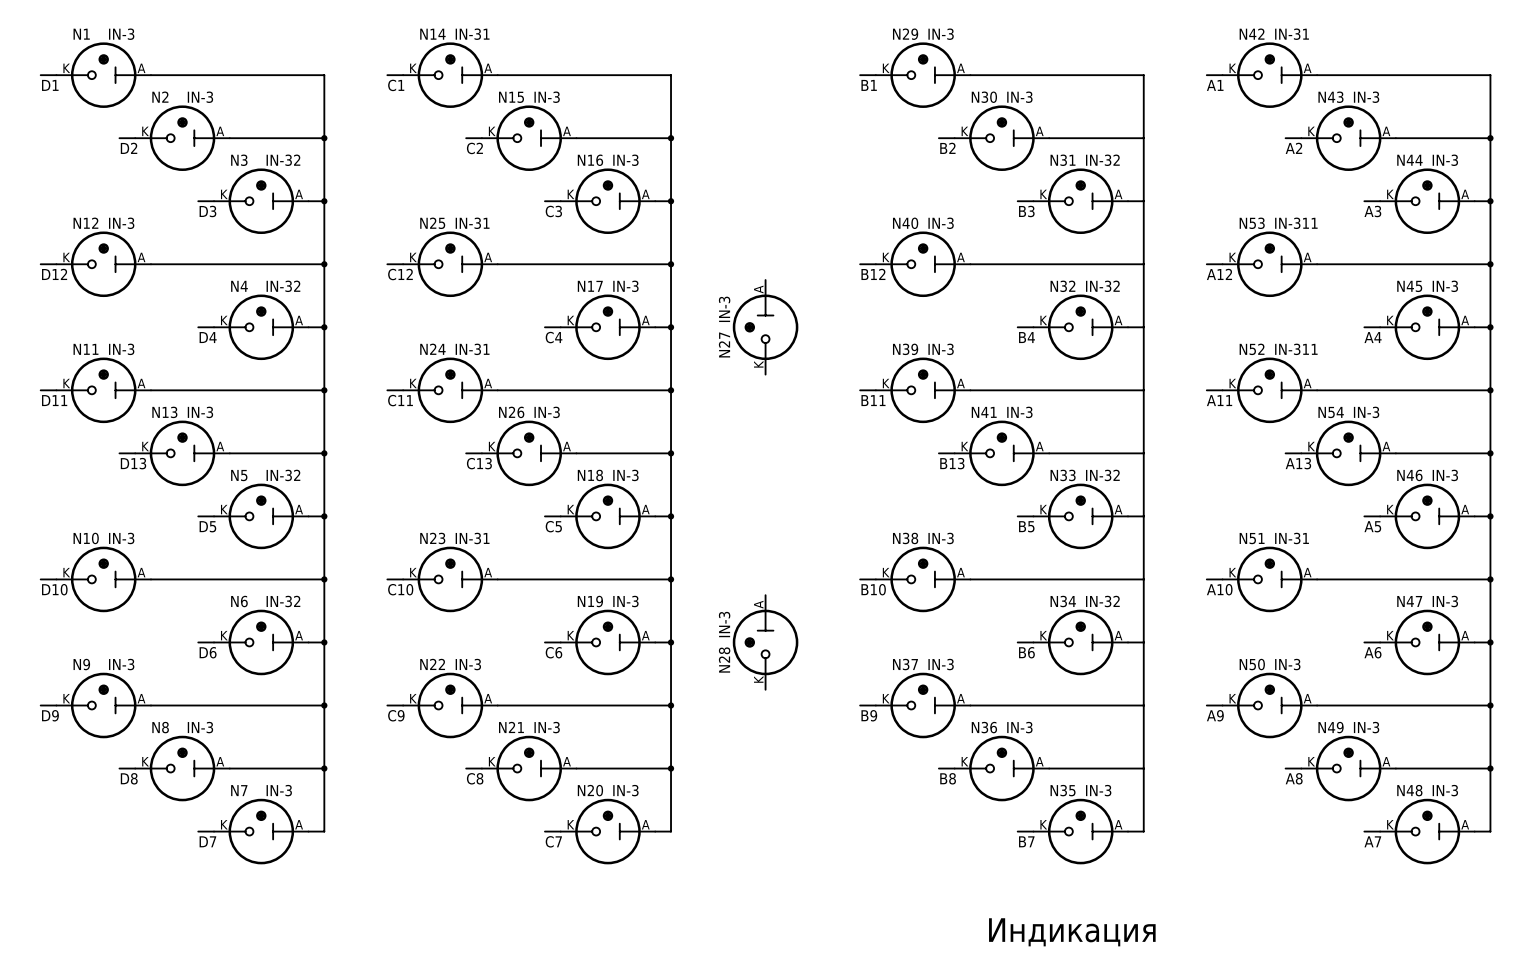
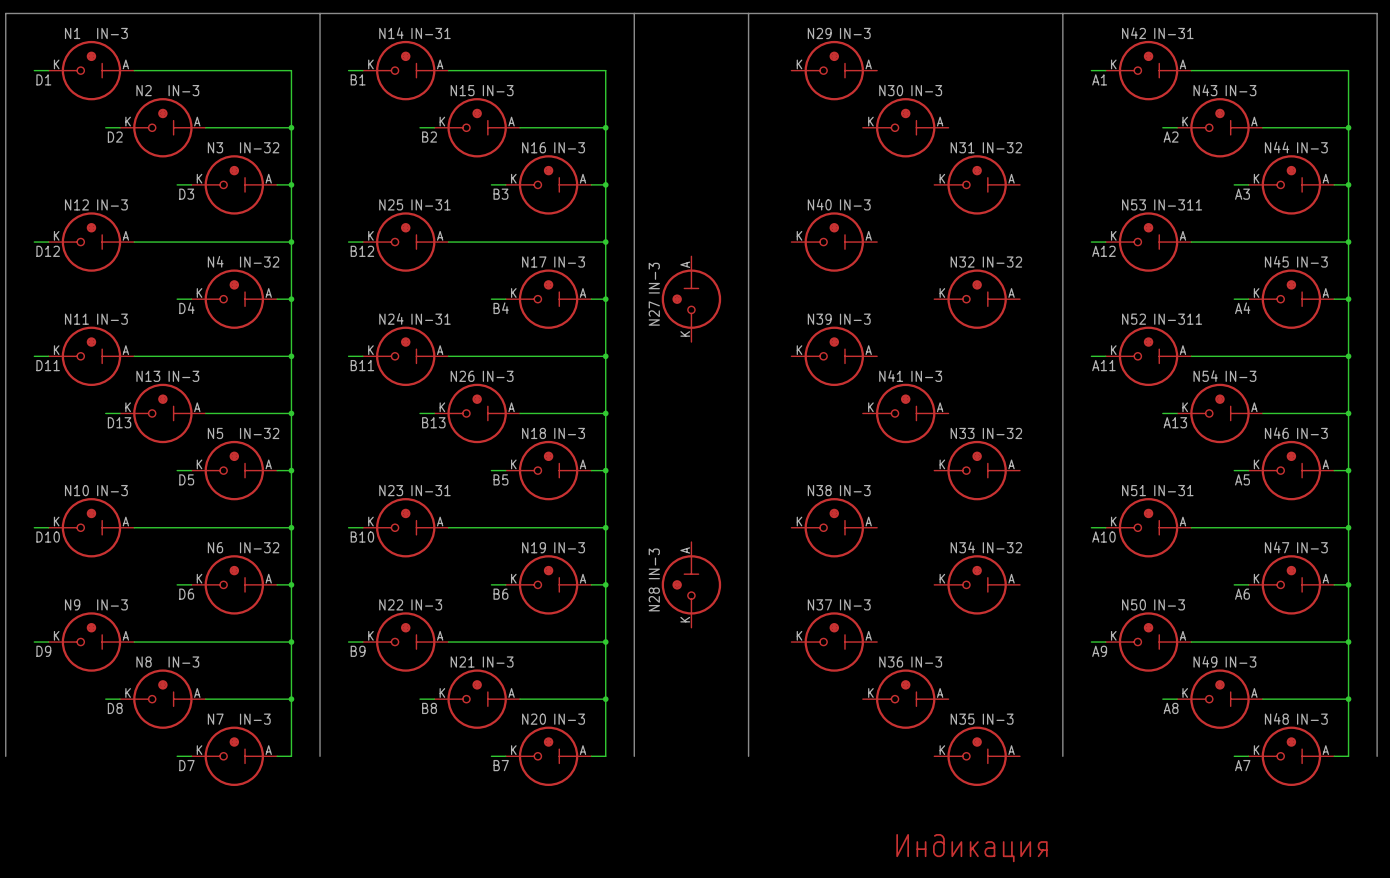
bus: none -> (320, 13) (320, 756)
bus: none -> (634, 13) (634, 756)
bus: none -> (748, 13) (748, 756)
bus: none -> (1062, 13) (1062, 756)
wire: (860, 75) (875, 75) -> none
wire: (970, 75) (1143, 75) (1143, 831) (1128, 831) -> none
label: C1 (396, 85) -> B1 (358, 79)
label: B1 (869, 85) -> none
wire: (938, 138) (954, 138) -> none
wire: (1049, 138) (1143, 138) -> none
label: C2 (474, 148) -> B2 (429, 137)
label: B2 (947, 148) -> none
wire: (1017, 201) (1033, 201) -> none
wire: (1128, 201) (1143, 201) -> none
label: C3 (553, 211) -> B3 (500, 194)
label: B3 (1026, 211) -> none
wire: (860, 264) (875, 264) -> none
wire: (970, 264) (1143, 264) -> none
label: C12 (400, 274) -> B12 (362, 251)
label: B12 (873, 274) -> none
wire: (1017, 327) (1033, 327) -> none
wire: (1128, 327) (1143, 327) -> none
label: C4 (554, 337) -> B4 (501, 308)
label: B4 (1026, 337) -> none
wire: (860, 390) (875, 390) -> none
wire: (970, 390) (1143, 390) -> none
label: C11 (400, 400) -> B11 (362, 365)
label: B11 (873, 400) -> none
wire: (938, 453) (954, 453) -> none
wire: (1049, 453) (1143, 453) -> none
label: C13 (479, 463) -> B13 (433, 422)
label: B13 (952, 463) -> none
wire: (1017, 516) (1033, 516) -> none
wire: (1128, 516) (1143, 516) -> none
label: C5 (553, 526) -> B5 (500, 479)
label: B5 (1026, 526) -> none
wire: (860, 579) (875, 579) -> none
wire: (970, 579) (1143, 579) -> none
label: C10 (400, 589) -> B10 (362, 537)
label: B10 (873, 589) -> none
wire: (1017, 642) (1033, 642) -> none
wire: (1128, 642) (1143, 642) -> none
label: C6 (553, 652) -> B6 (500, 594)
label: B6 (1026, 652) -> none
wire: (860, 705) (875, 705) -> none
wire: (970, 705) (1143, 705) -> none
label: C9 (396, 715) -> B9 (358, 651)
label: B9 (869, 715) -> none
wire: (938, 768) (954, 768) -> none
wire: (1049, 768) (1143, 768) -> none
label: C8 (475, 778) -> B8 (429, 708)
label: B8 (948, 778) -> none
bus: none -> (5, 756) (5, 13) (1377, 13) (1377, 756)
wire: (1017, 831) (1033, 831) -> none
label: C7 (553, 841) -> B7 (501, 765)
label: B7 (1026, 841) -> none

